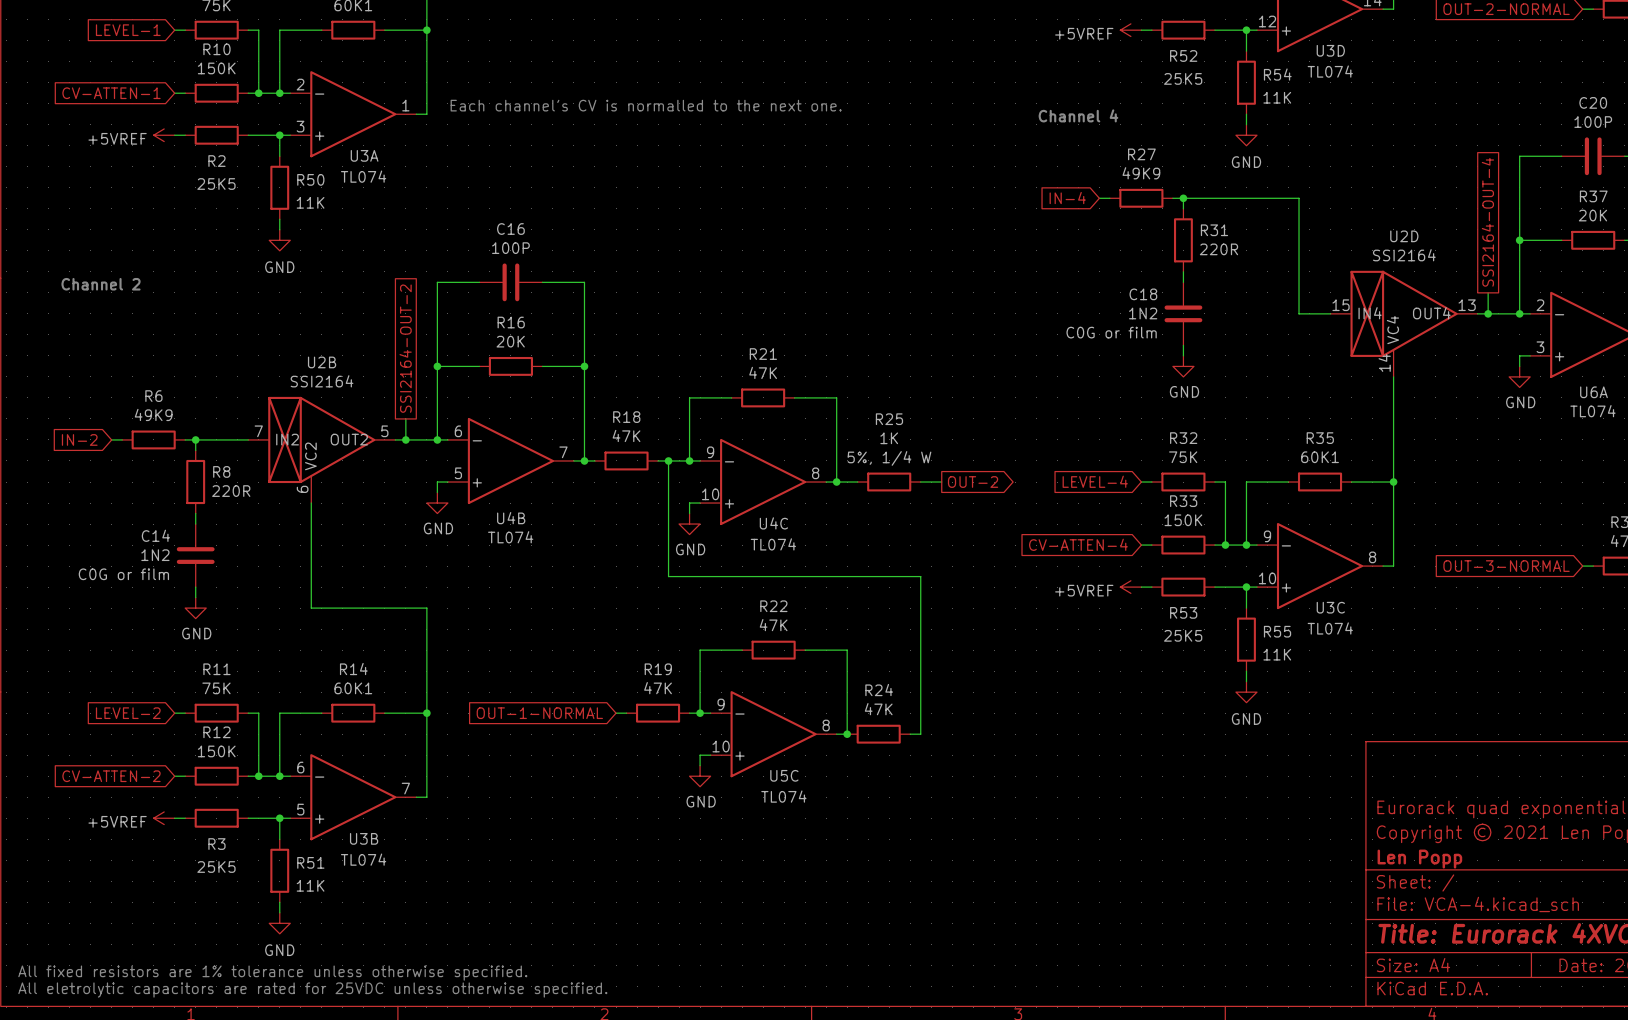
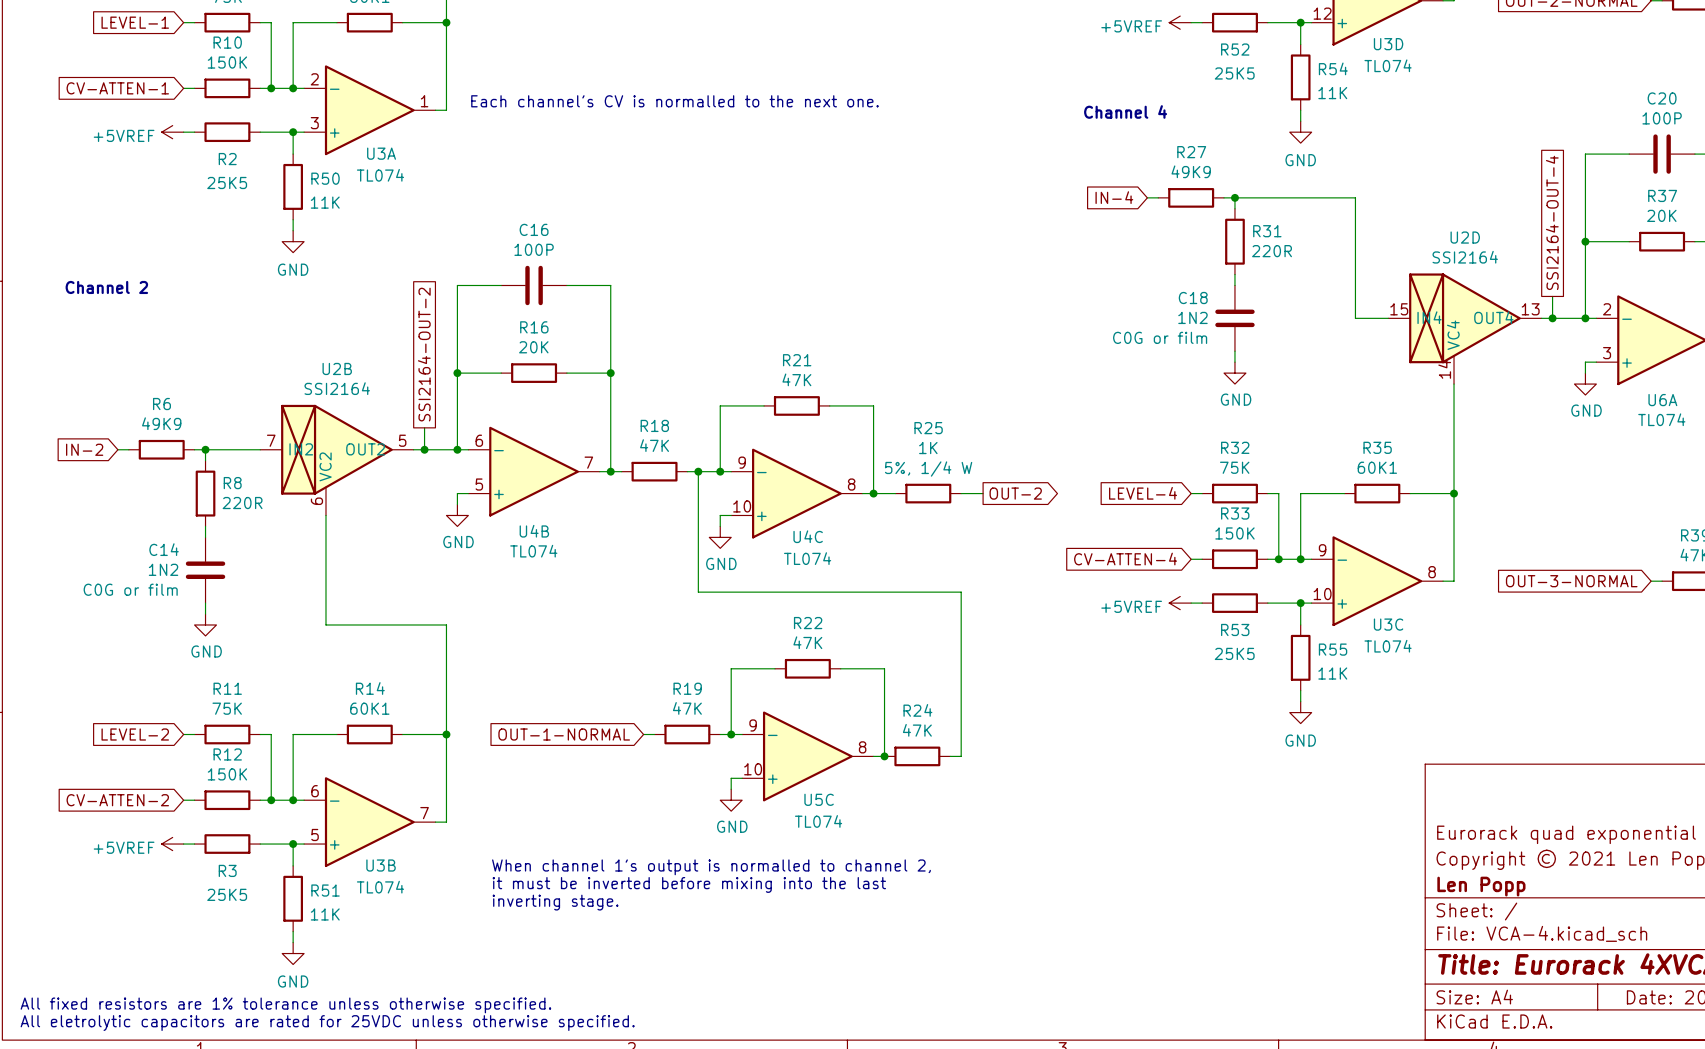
text: none -> When channel 1's output is normalled to channel 2, (711, 867)
text: none -> it must be inverted before mixing into the last (689, 884)
text: none -> inverting stage. (555, 902)

